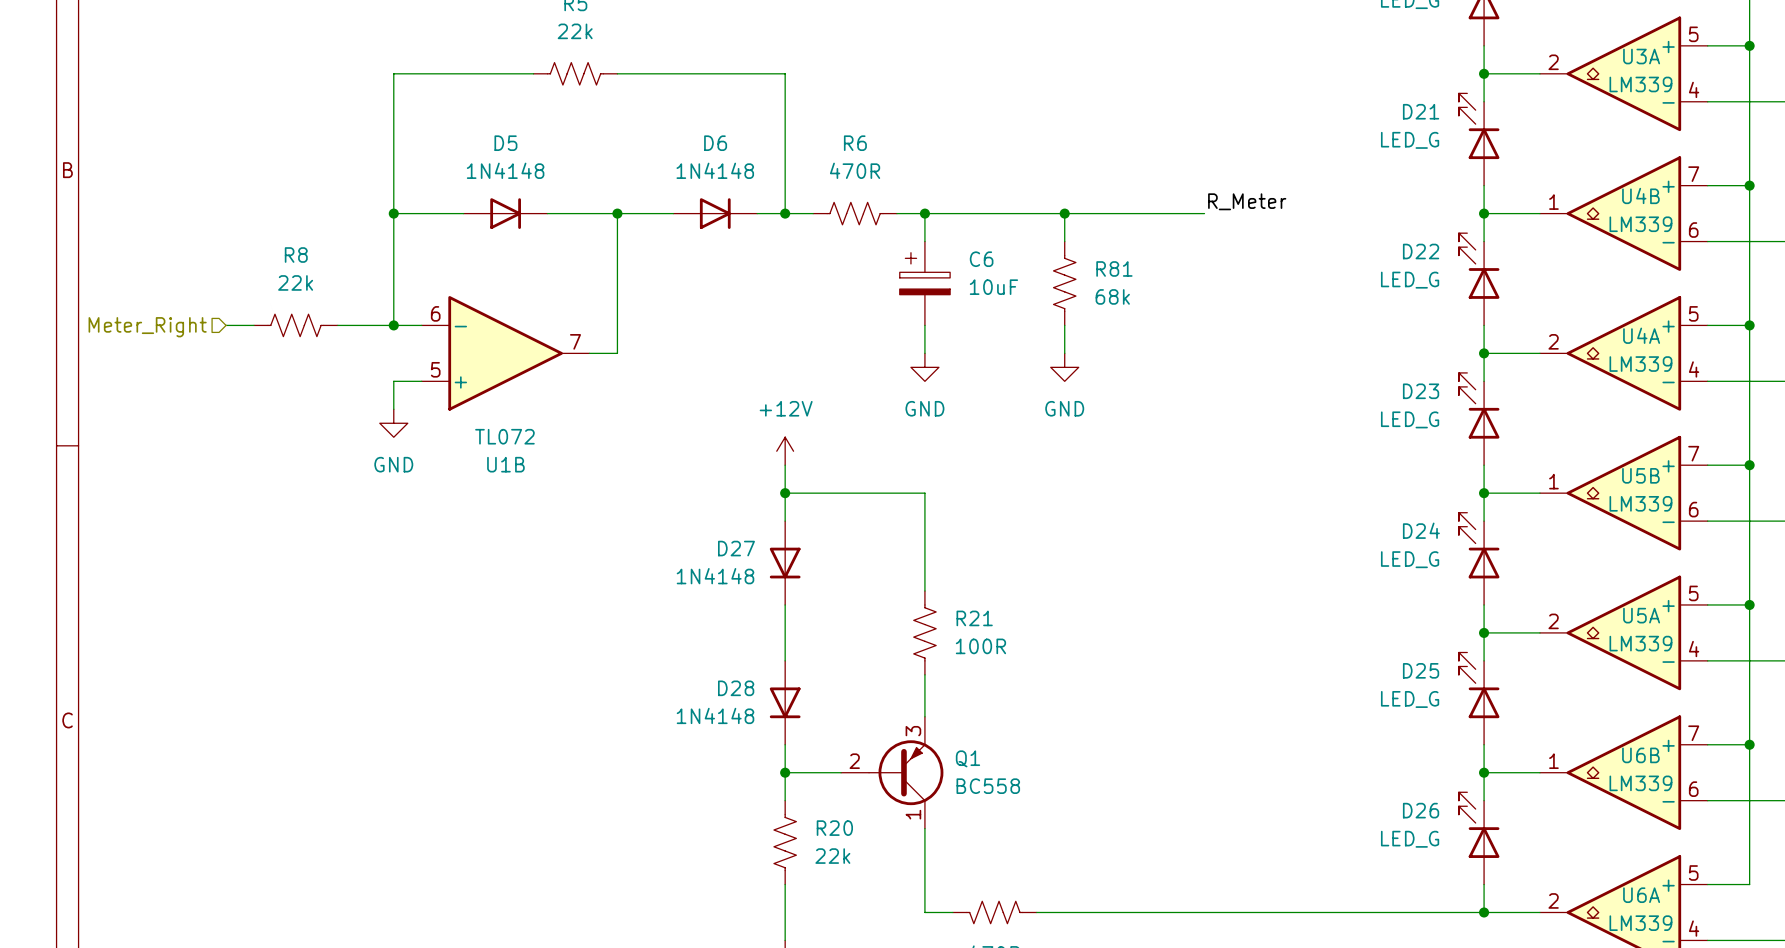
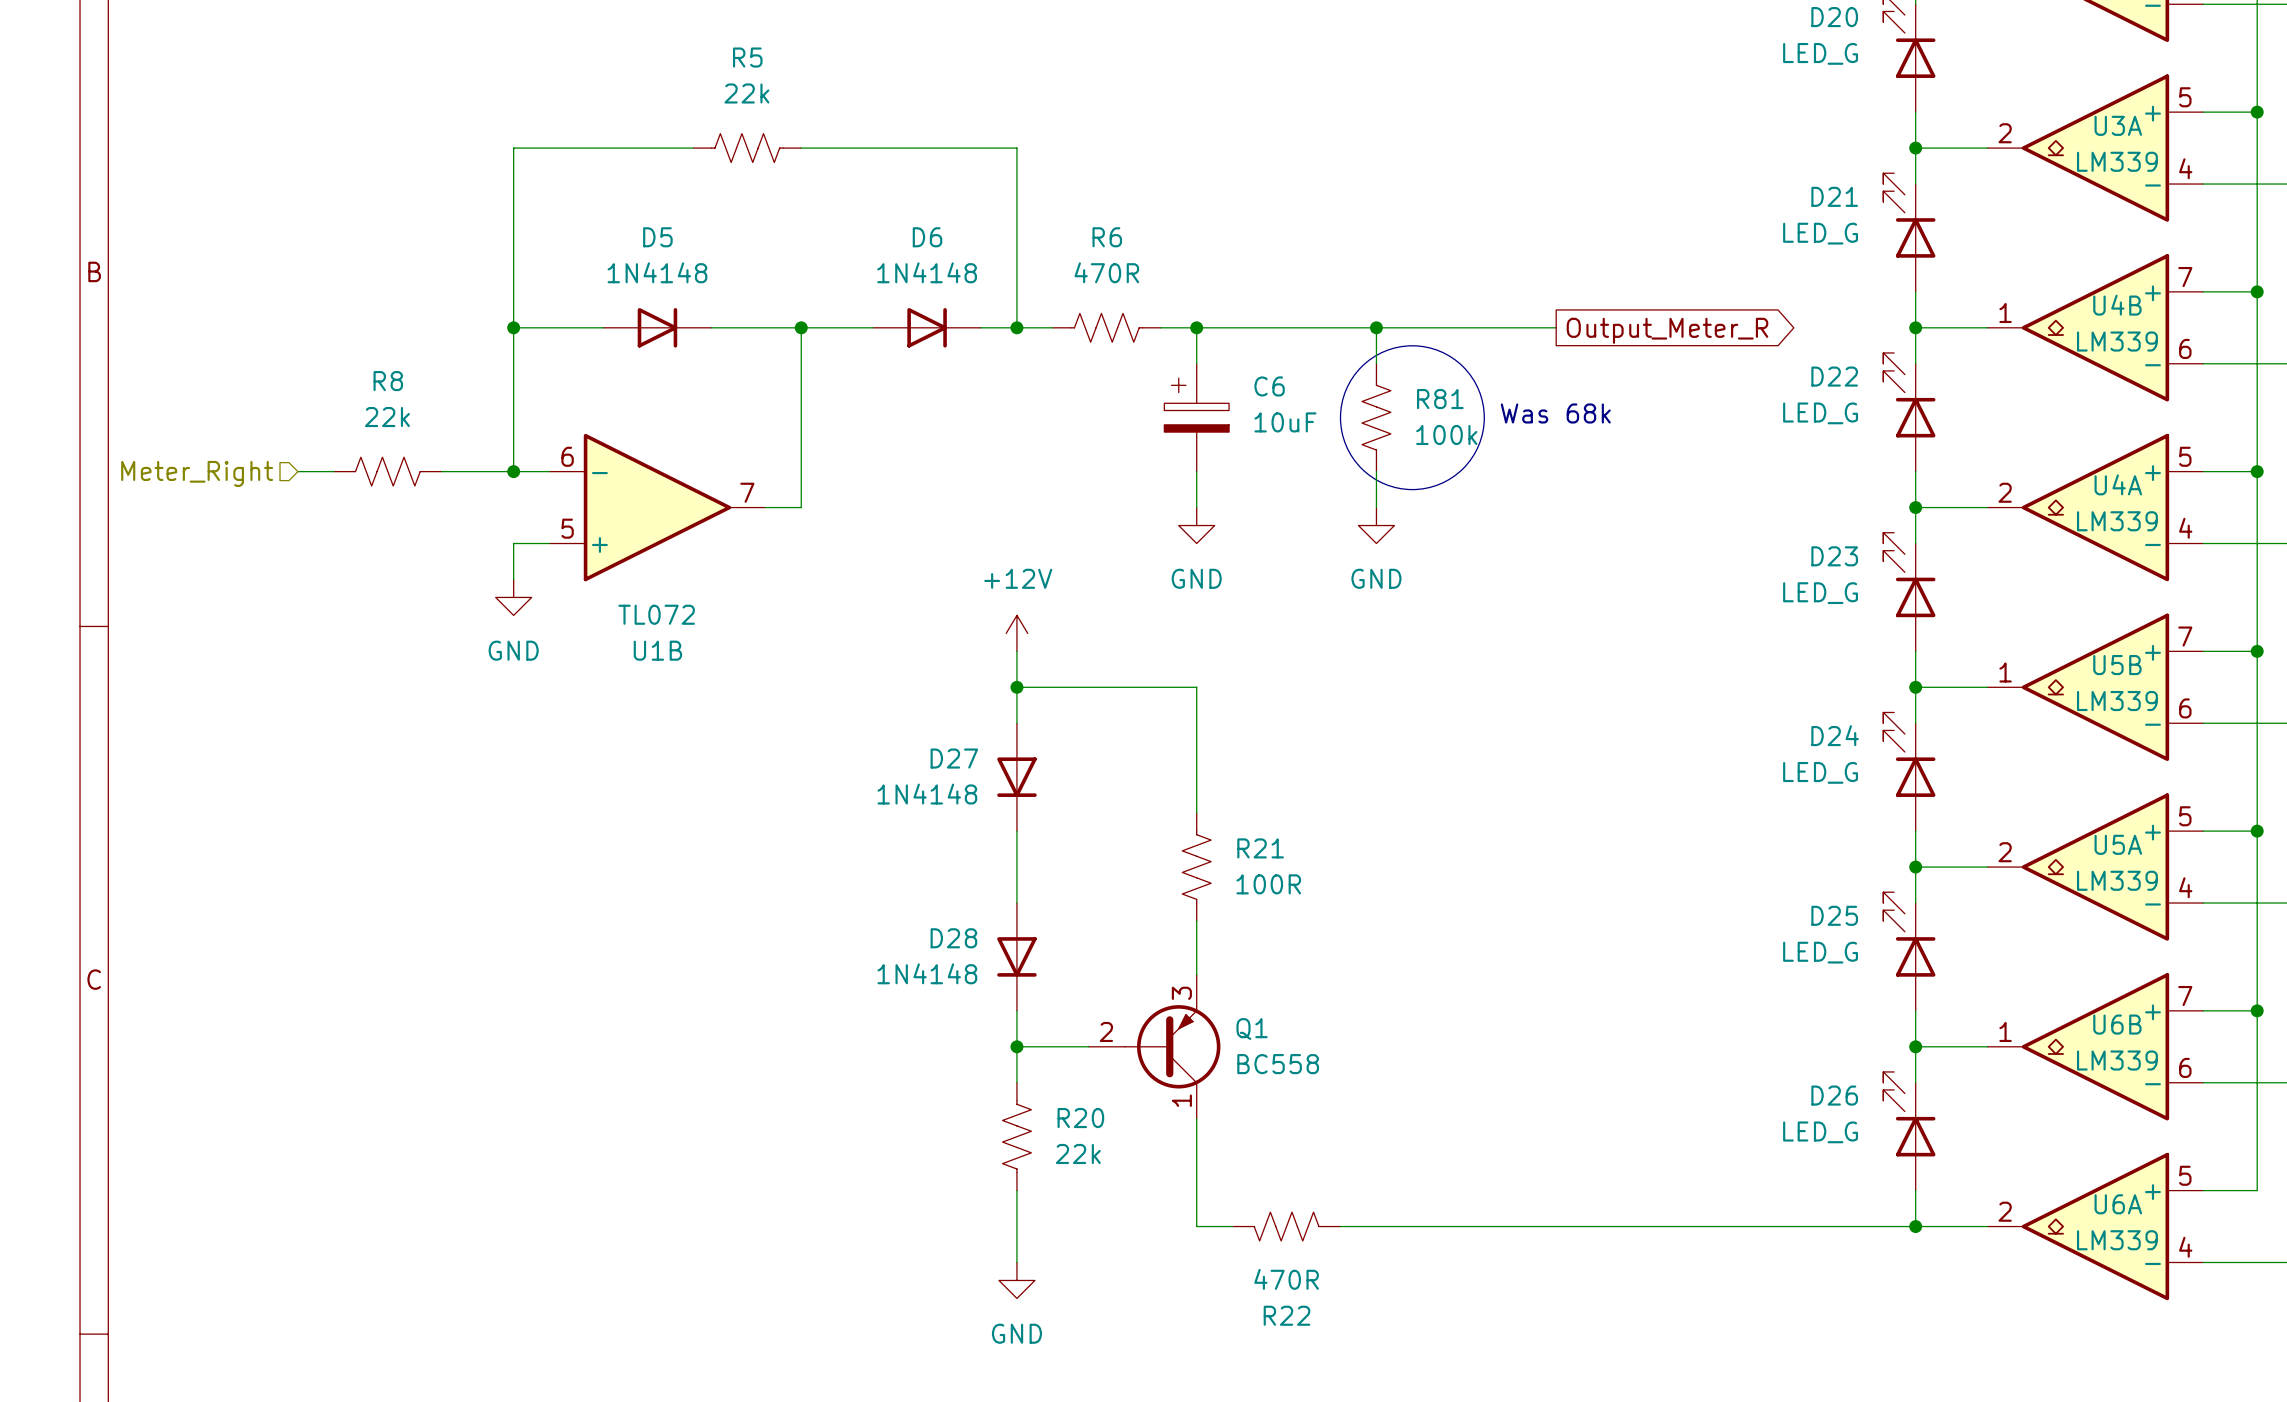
label: R_Meter (1247, 201) -> none
global label: none -> Output_Meter_R (1667, 330)
drawing: none -> [1340, 345, 1485, 490]
text: none -> Was 68k (1555, 413)
R81 value: 68k (1112, 296) -> 100k (1446, 434)

